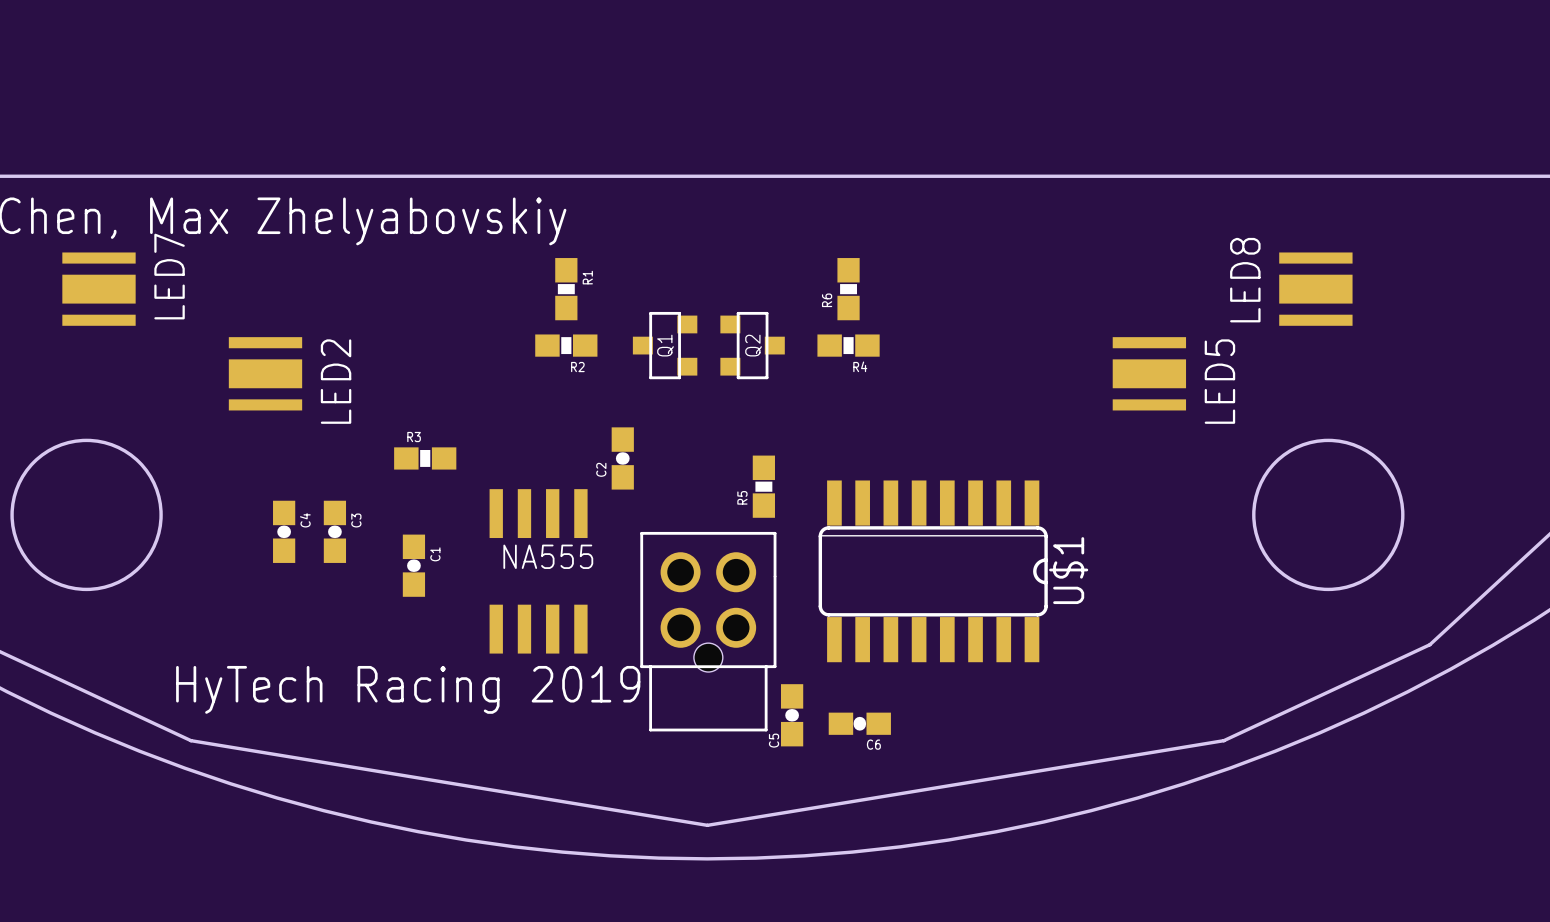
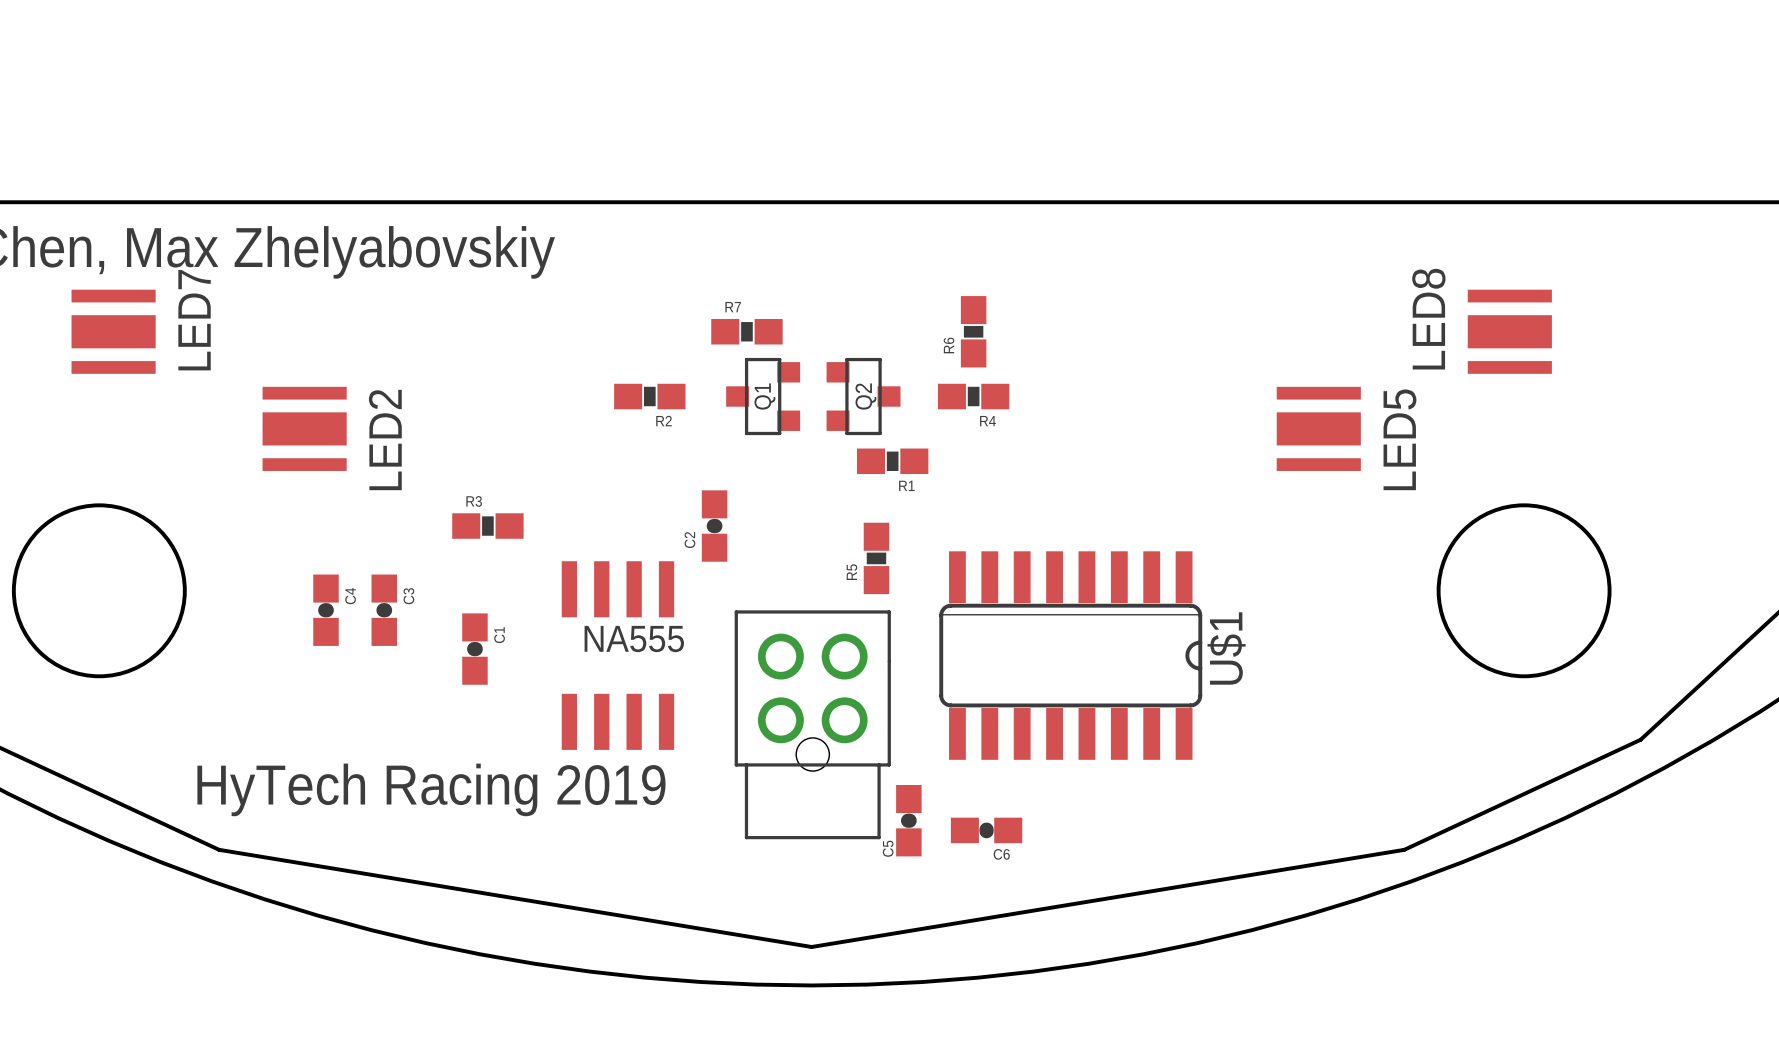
R1 rotation: 0° (566, 289) -> 90° clockwise (892, 461)
R1 position: (566, 289) -> (892, 461)
R7: none -> (746, 331)

